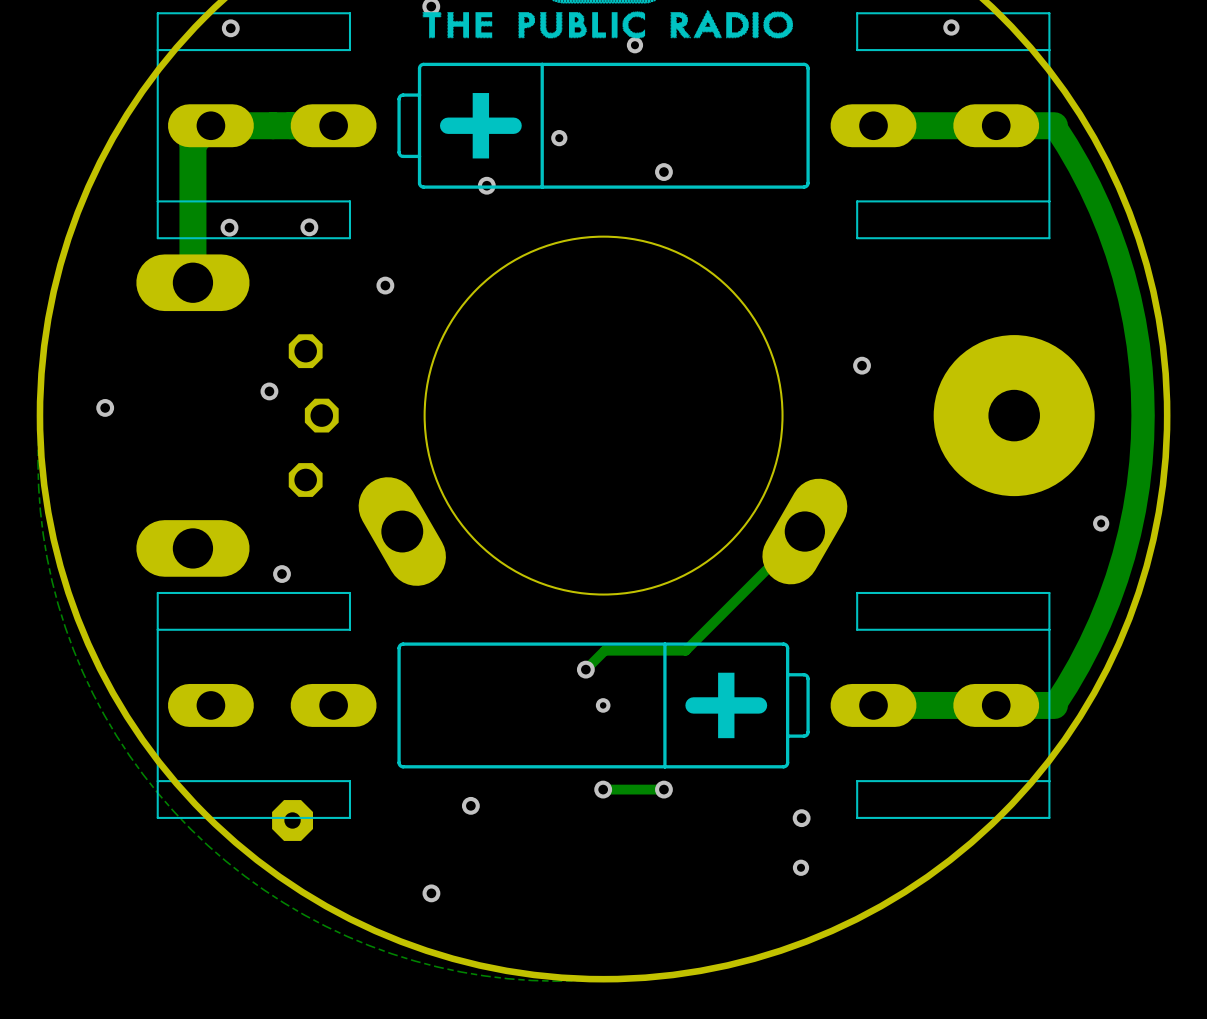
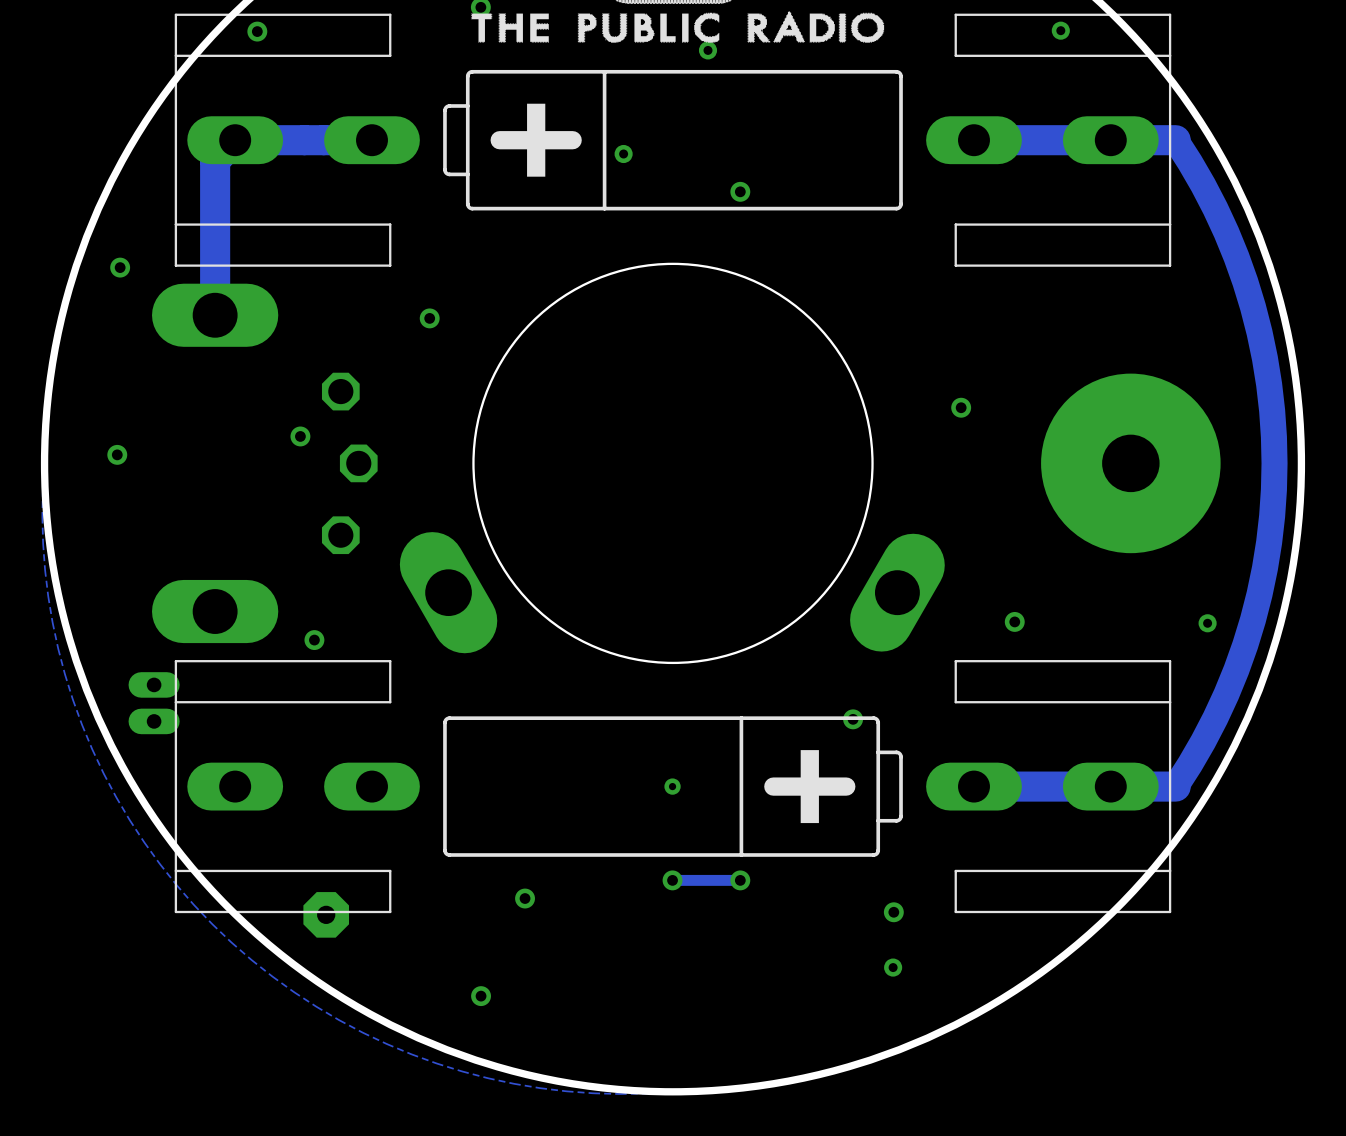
via: (486, 185) -> none
via: (229, 227) -> none
via: (309, 227) -> none
via: none -> (120, 267)
via position: (1101, 523) -> (1207, 623)
track: (804, 531) (685, 650) (604, 650) (585, 669) -> none
via: none -> (1014, 621)
part: none -> (154, 703)
via: none -> (853, 719)
via: (585, 669) -> none

